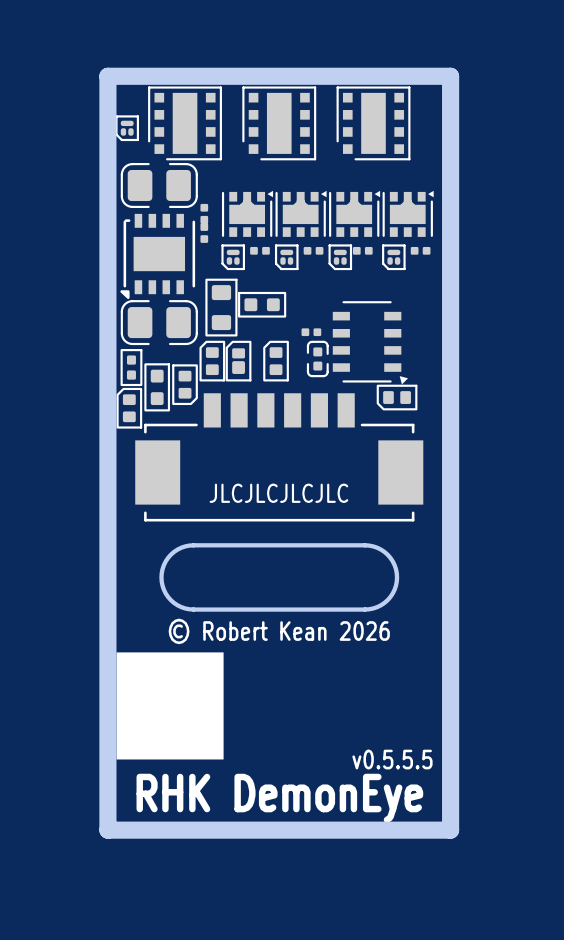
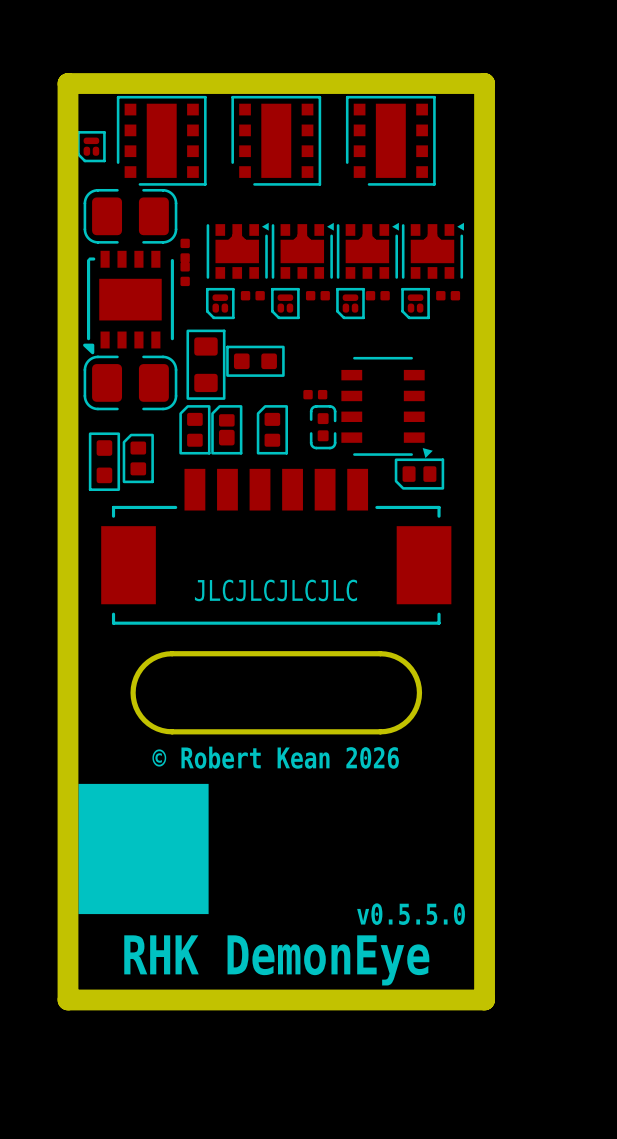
part footprint: [144, 363, 171, 412] -> [122, 433, 154, 484]
part: (131, 367) -> none
part: (185, 384) -> none
part: none -> (104, 461)
part: (129, 407) -> none
text: v0.5.5.5 (392, 759) -> v0.5.5.0 (411, 914)

